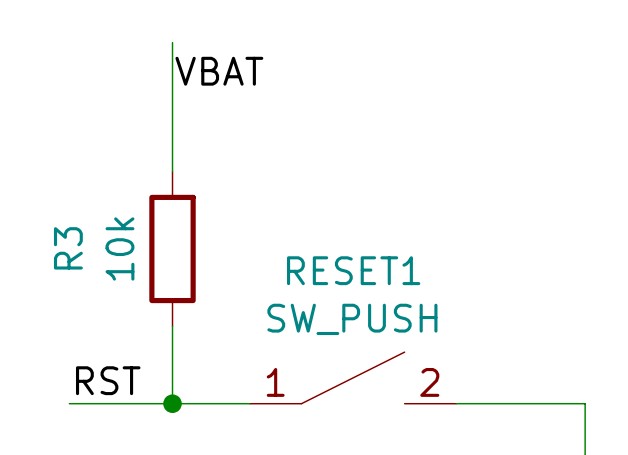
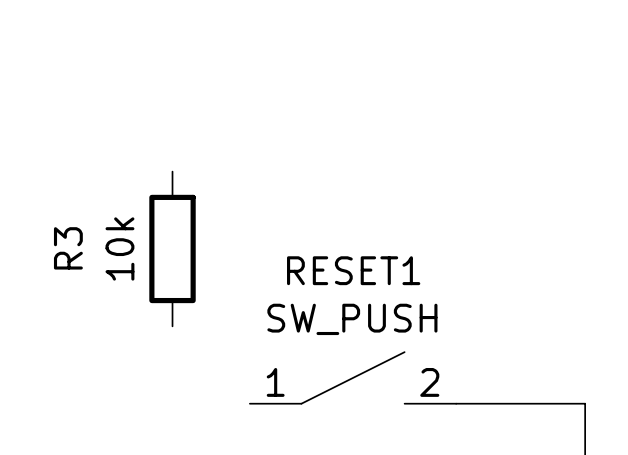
wire: (172, 42) (172, 171) -> none
label: VBAT (219, 71) -> none
wire: (172, 326) (172, 403) -> none
label: RST (108, 380) -> none
wire: (69, 403) (249, 403) -> none
junction: (172, 403) -> none

